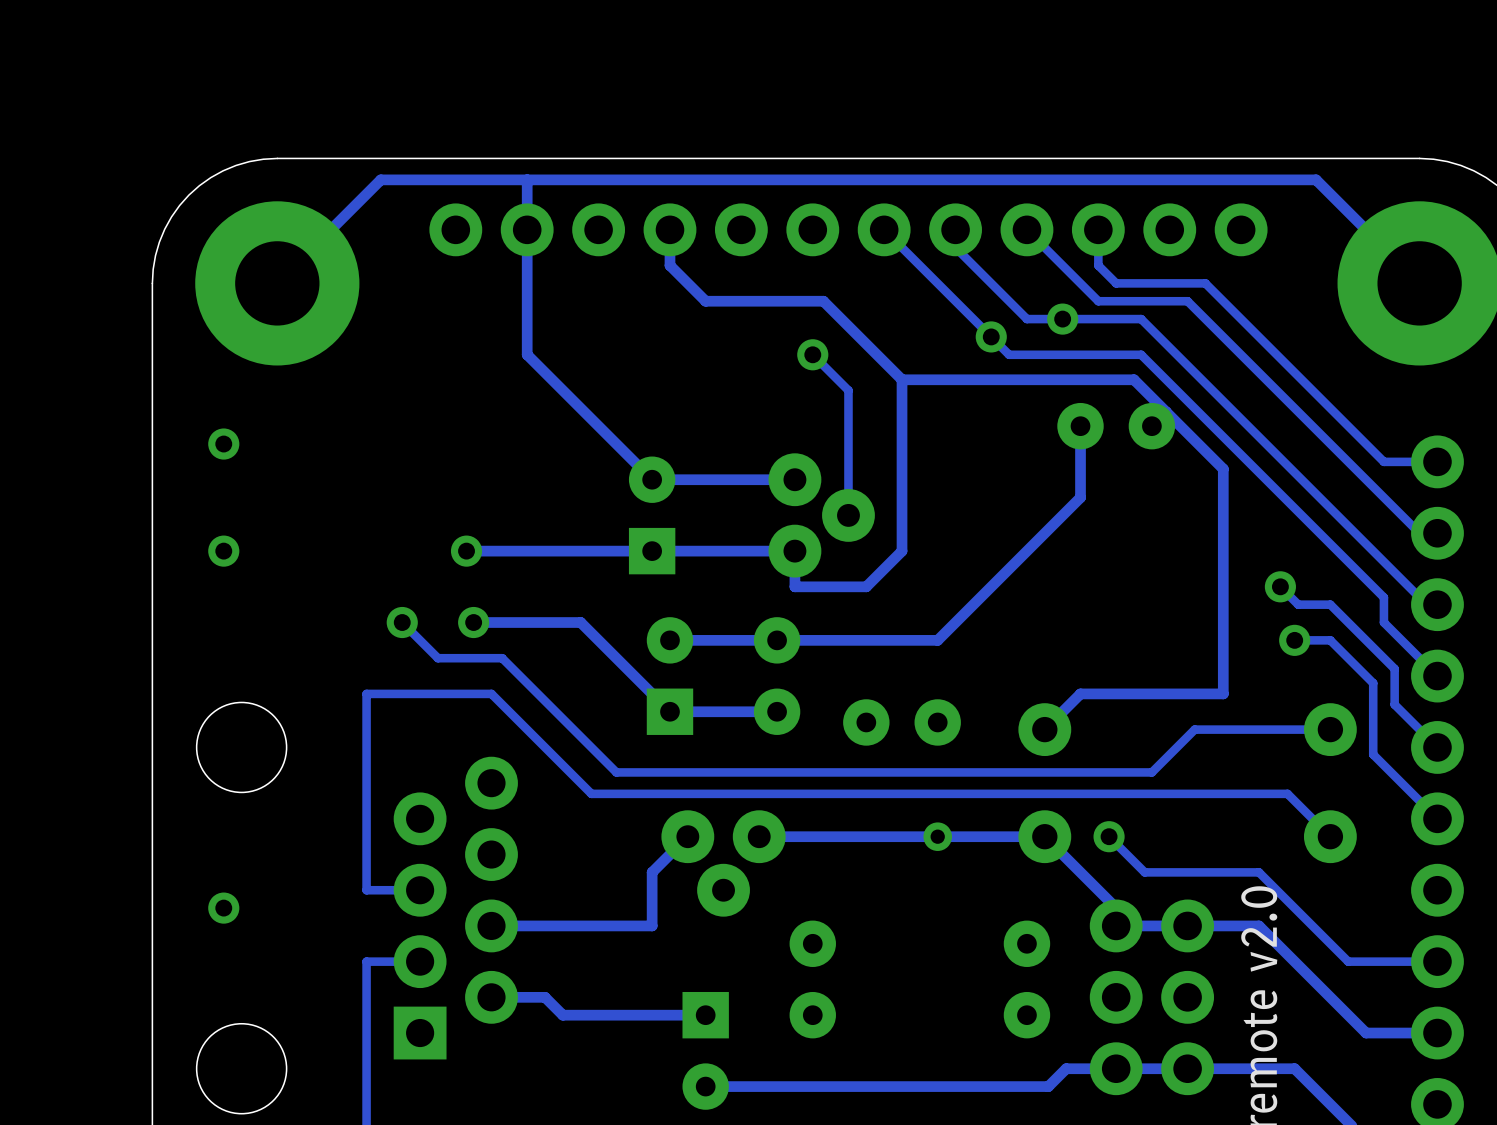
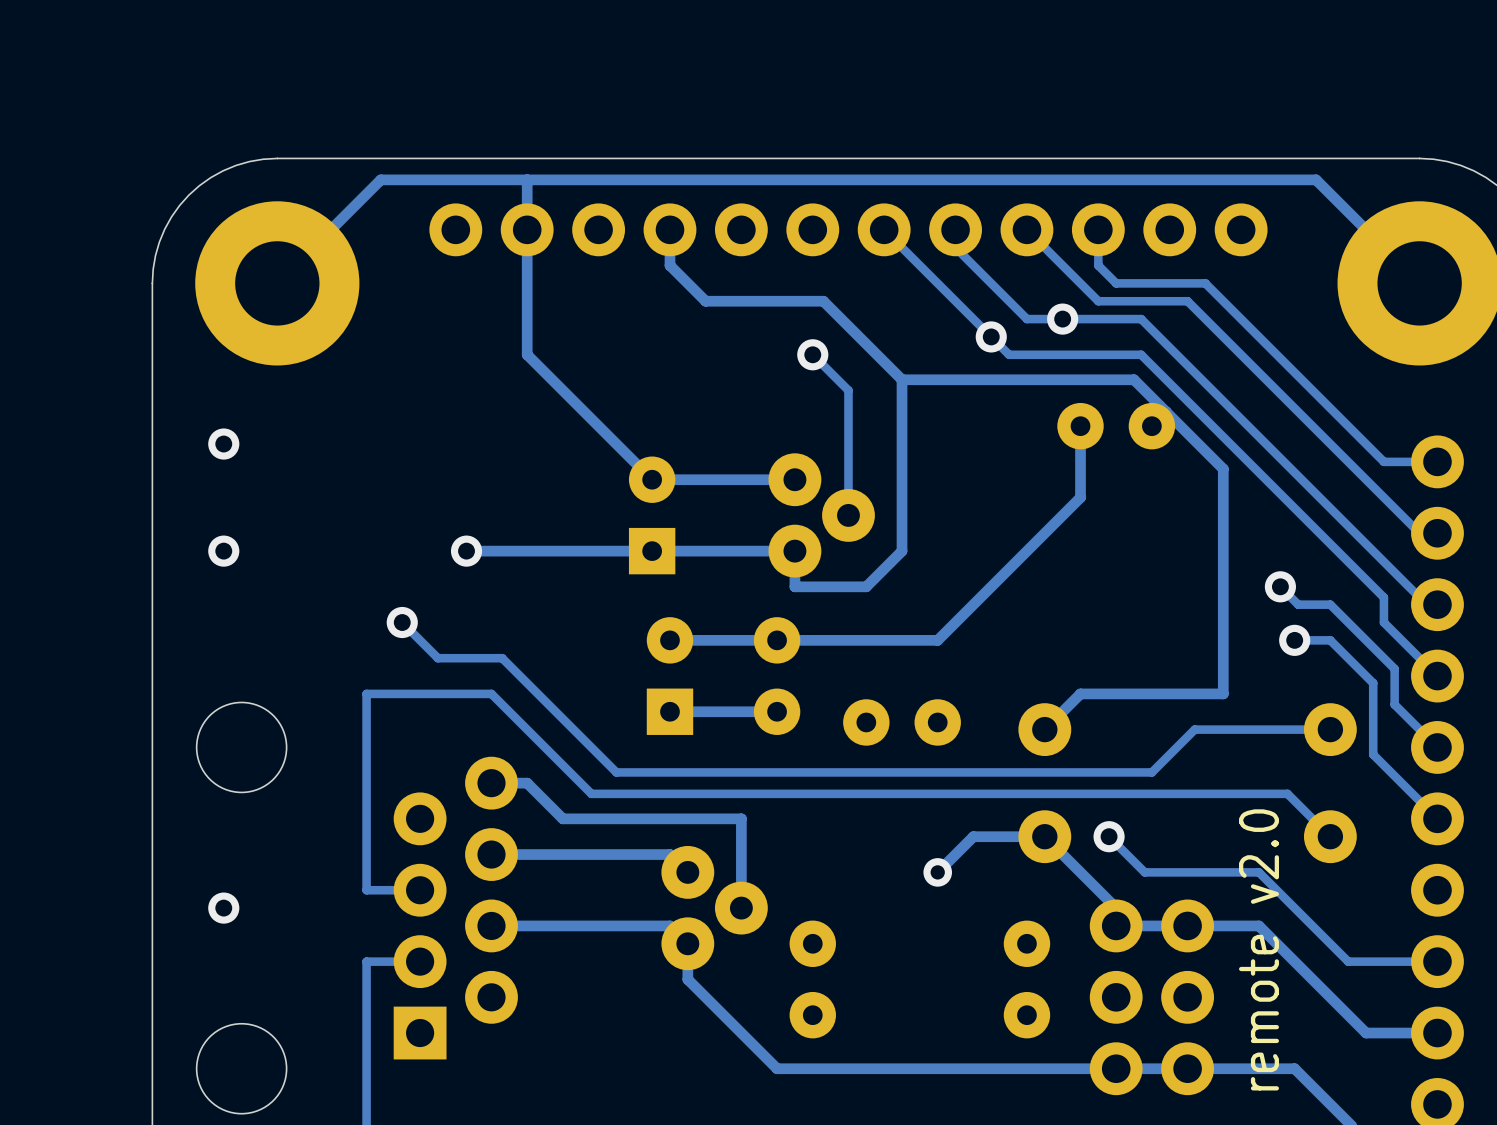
track: (473, 622) (580, 622) (669, 711) -> none
via: (473, 622) -> none
track: none -> (491, 783) (527, 783) (562, 818) (741, 818) (741, 908)
track: (687, 836) (652, 872) (652, 925) -> none
via position: (937, 836) -> (937, 872)
track: (973, 836) (759, 836) -> (973, 836) (937, 872)
track: none -> (491, 854) (669, 854) (687, 872)
part rotation: 0° (723, 863) -> 90° counterclockwise (714, 908)
track: (491, 997) (545, 997) (562, 1015) (705, 1015) -> none
part: (705, 1050) -> none
track: (1066, 1068) (1048, 1086) (705, 1086) -> (1066, 1068) (777, 1068) (687, 979) (687, 943) (669, 925) (652, 925)

